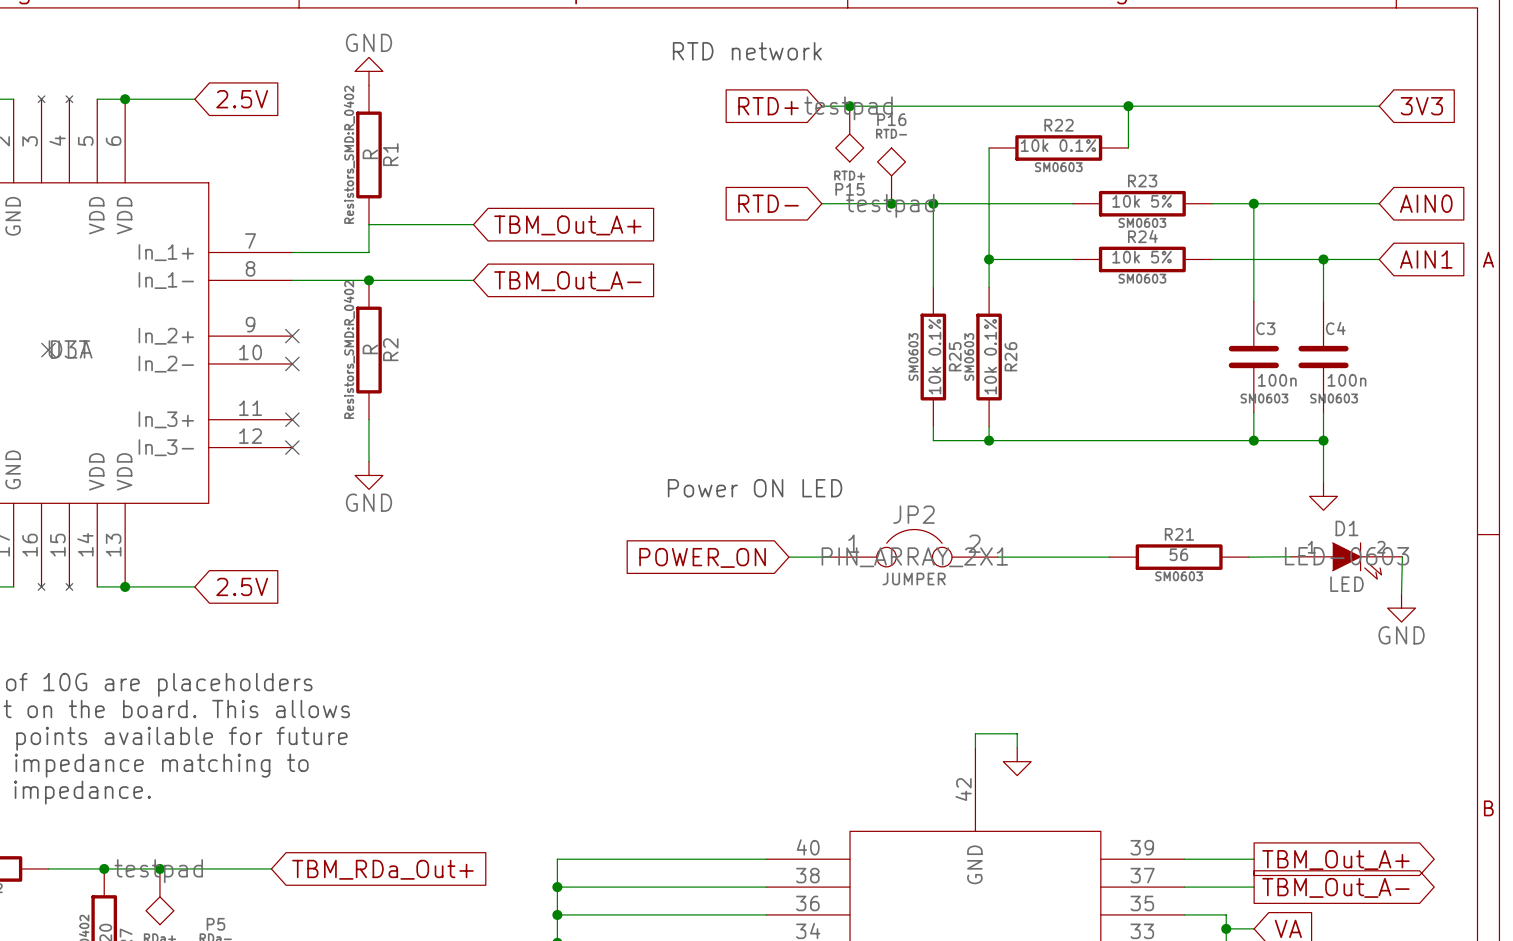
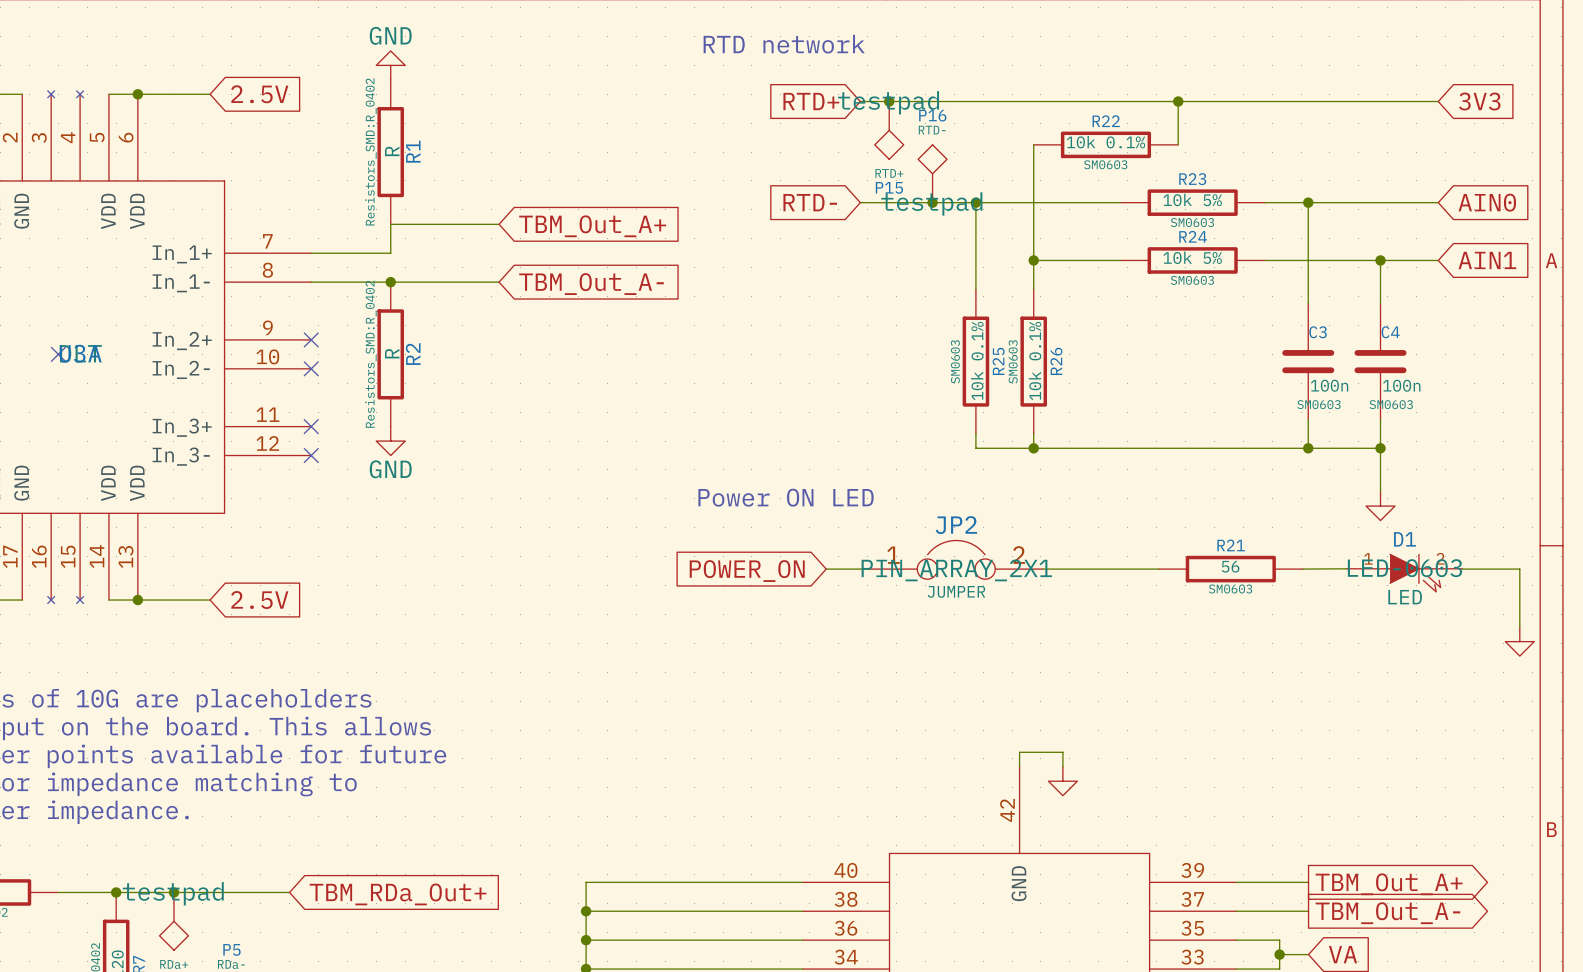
wire: (368, 419) (368, 461) -> none
power symbol position: GND (368, 475) -> GND (390, 441)
wire: (1402, 556) (1401, 594) -> (1462, 569) (1519, 569) (1519, 626)
power symbol: GND (1401, 608) -> none
power symbol: none -> (1519, 641)

